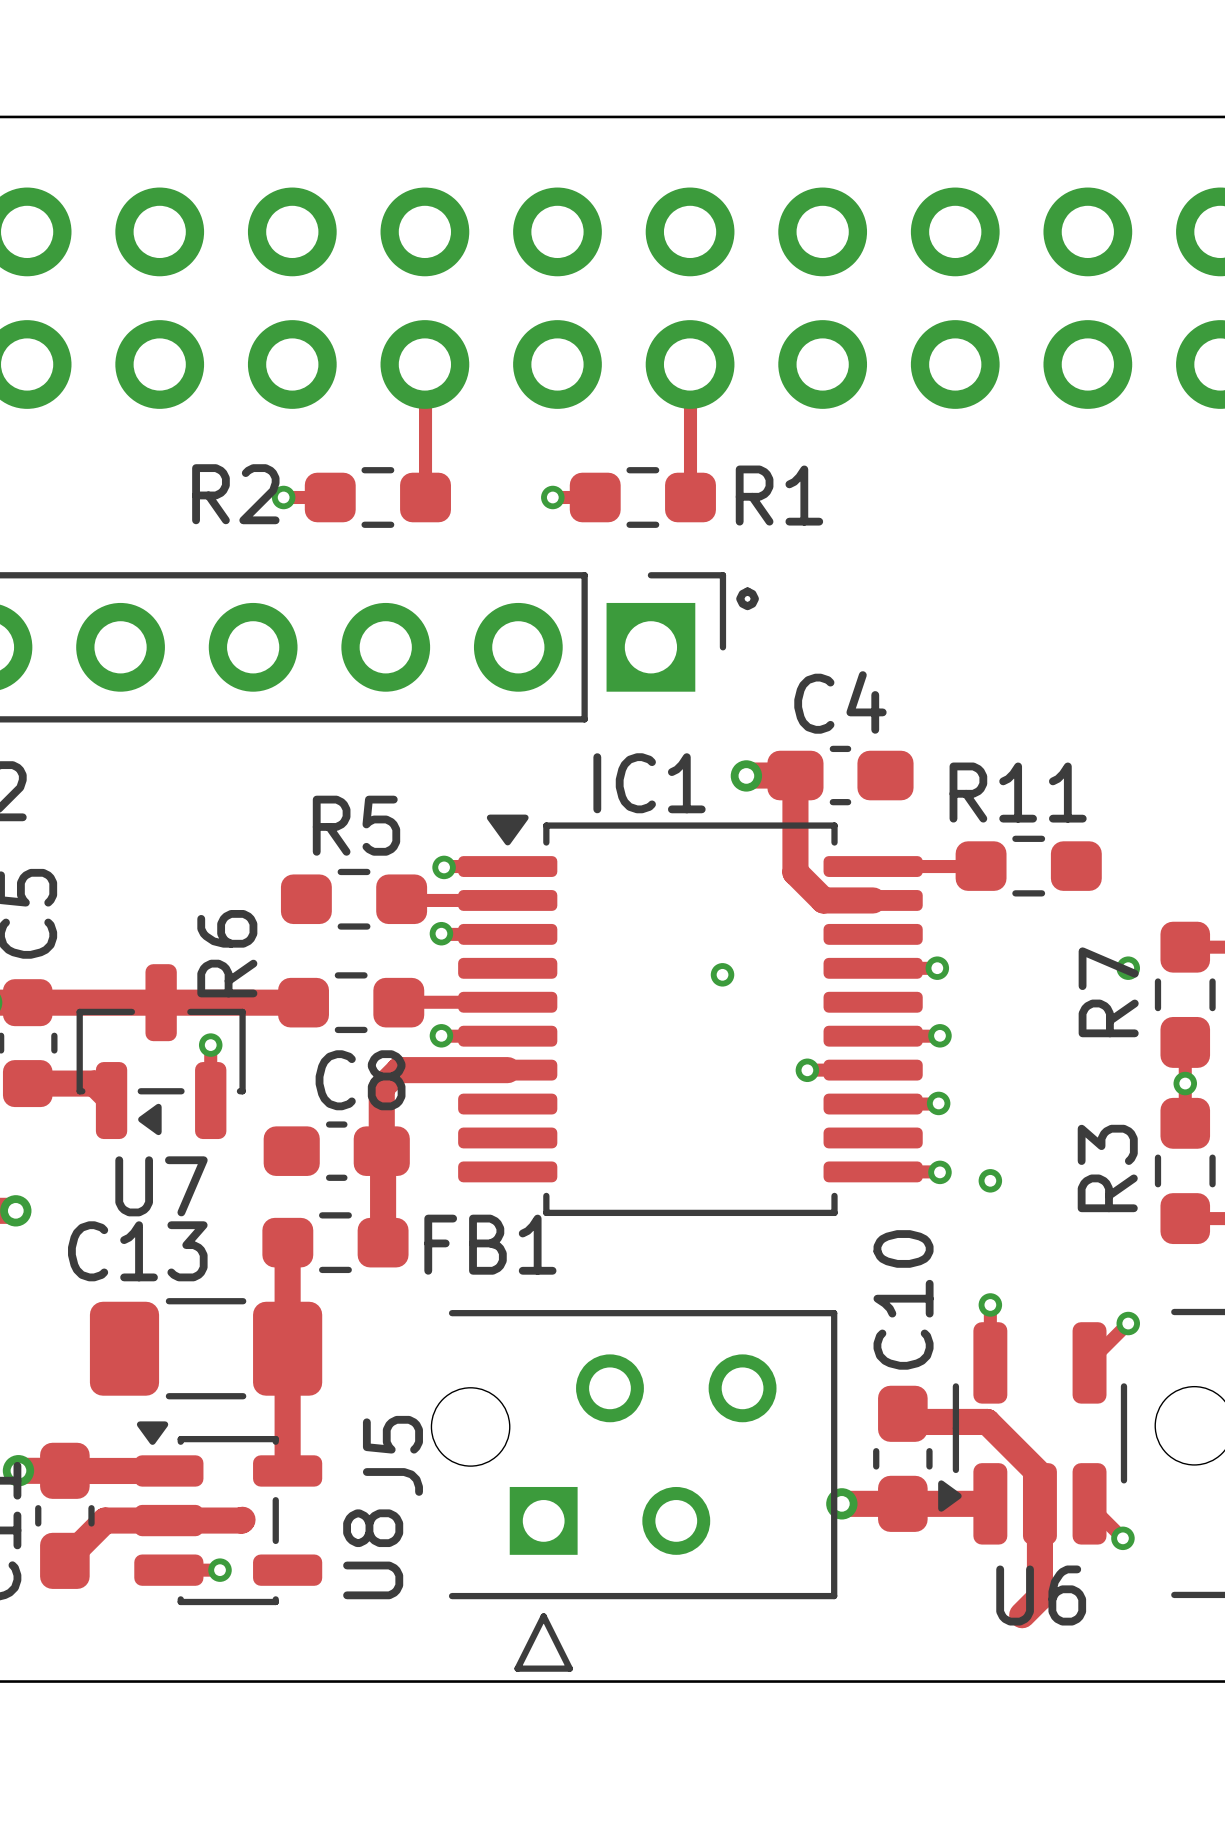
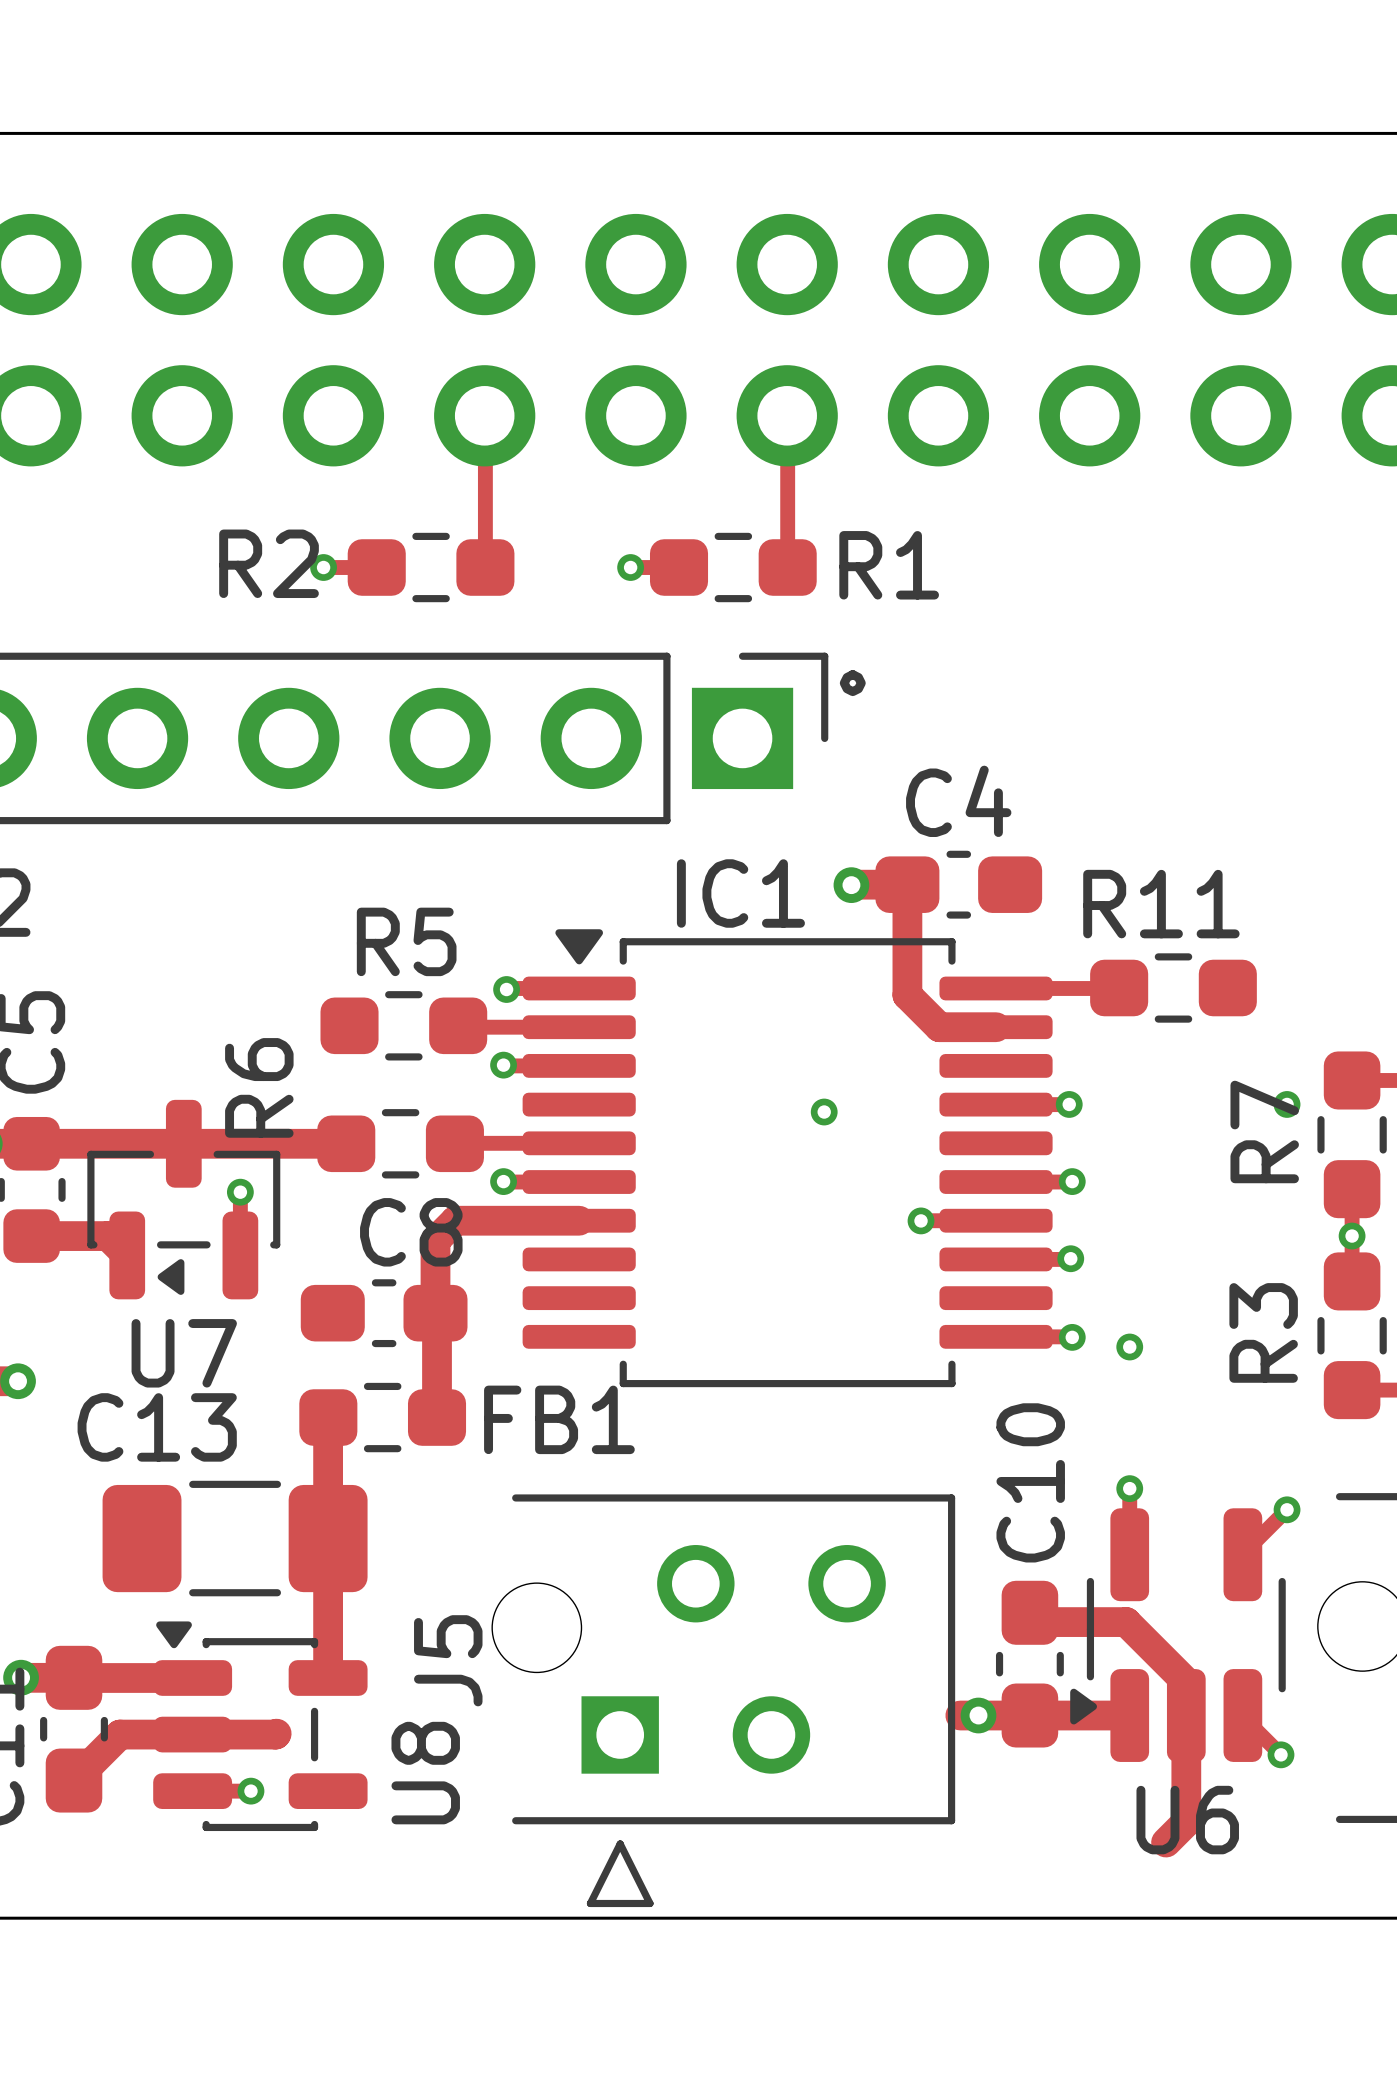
via position: (841, 1503) -> (978, 1715)

